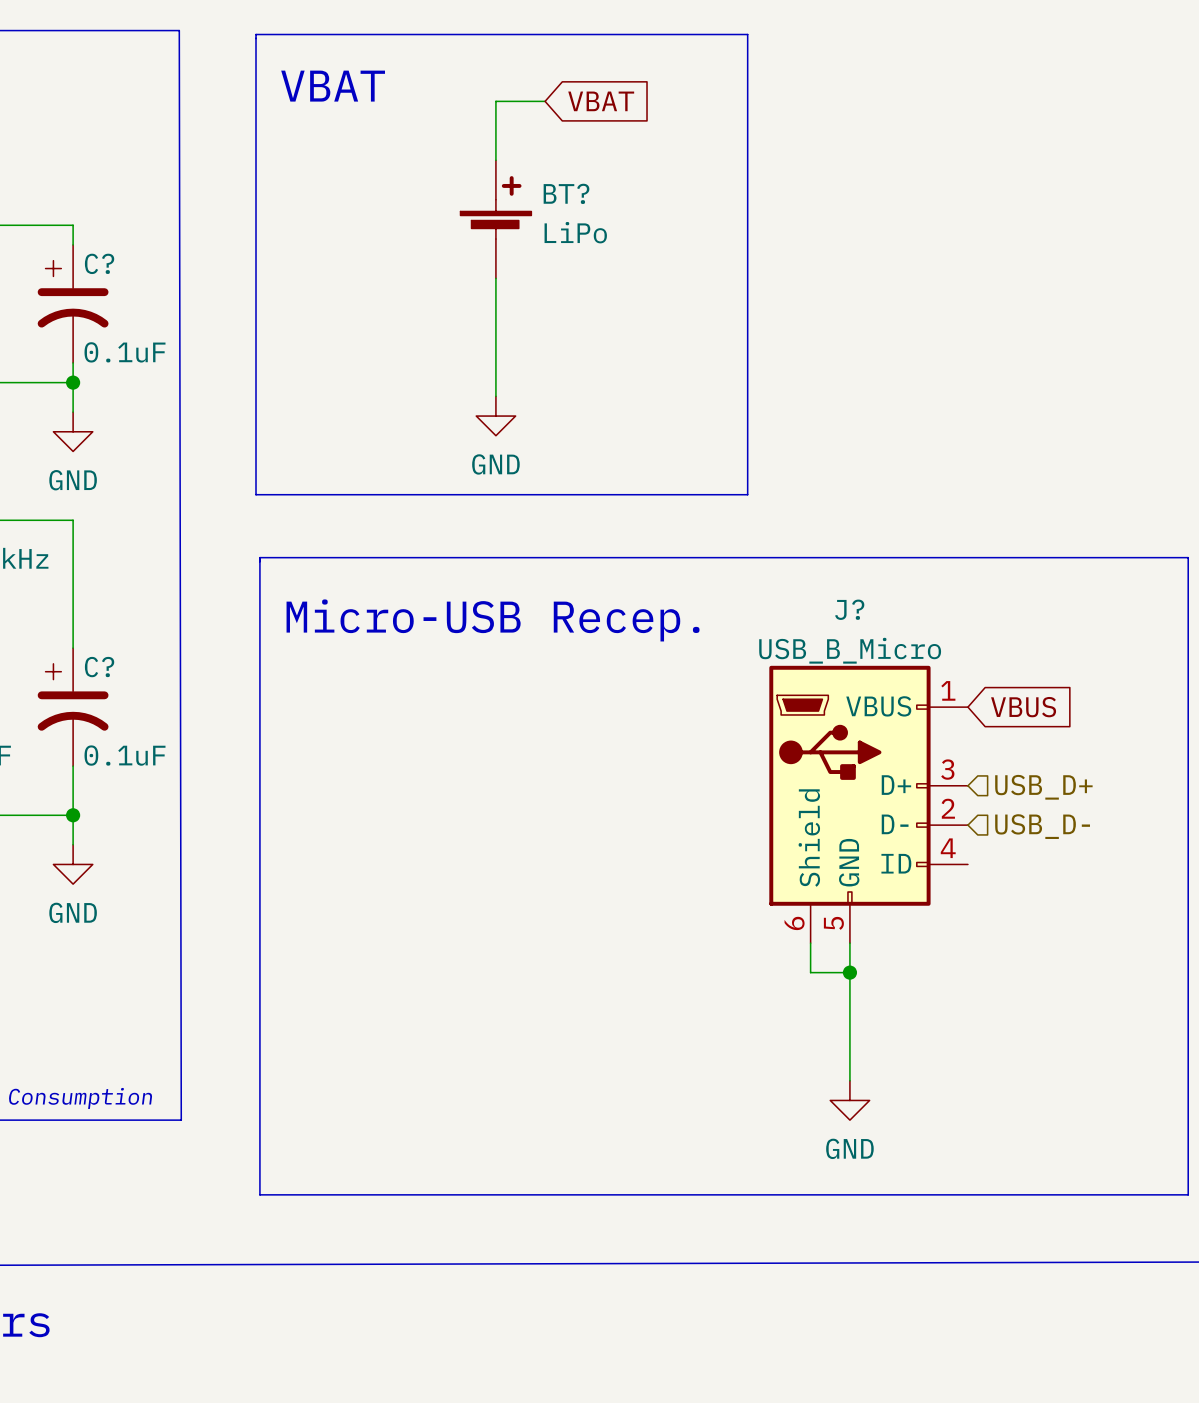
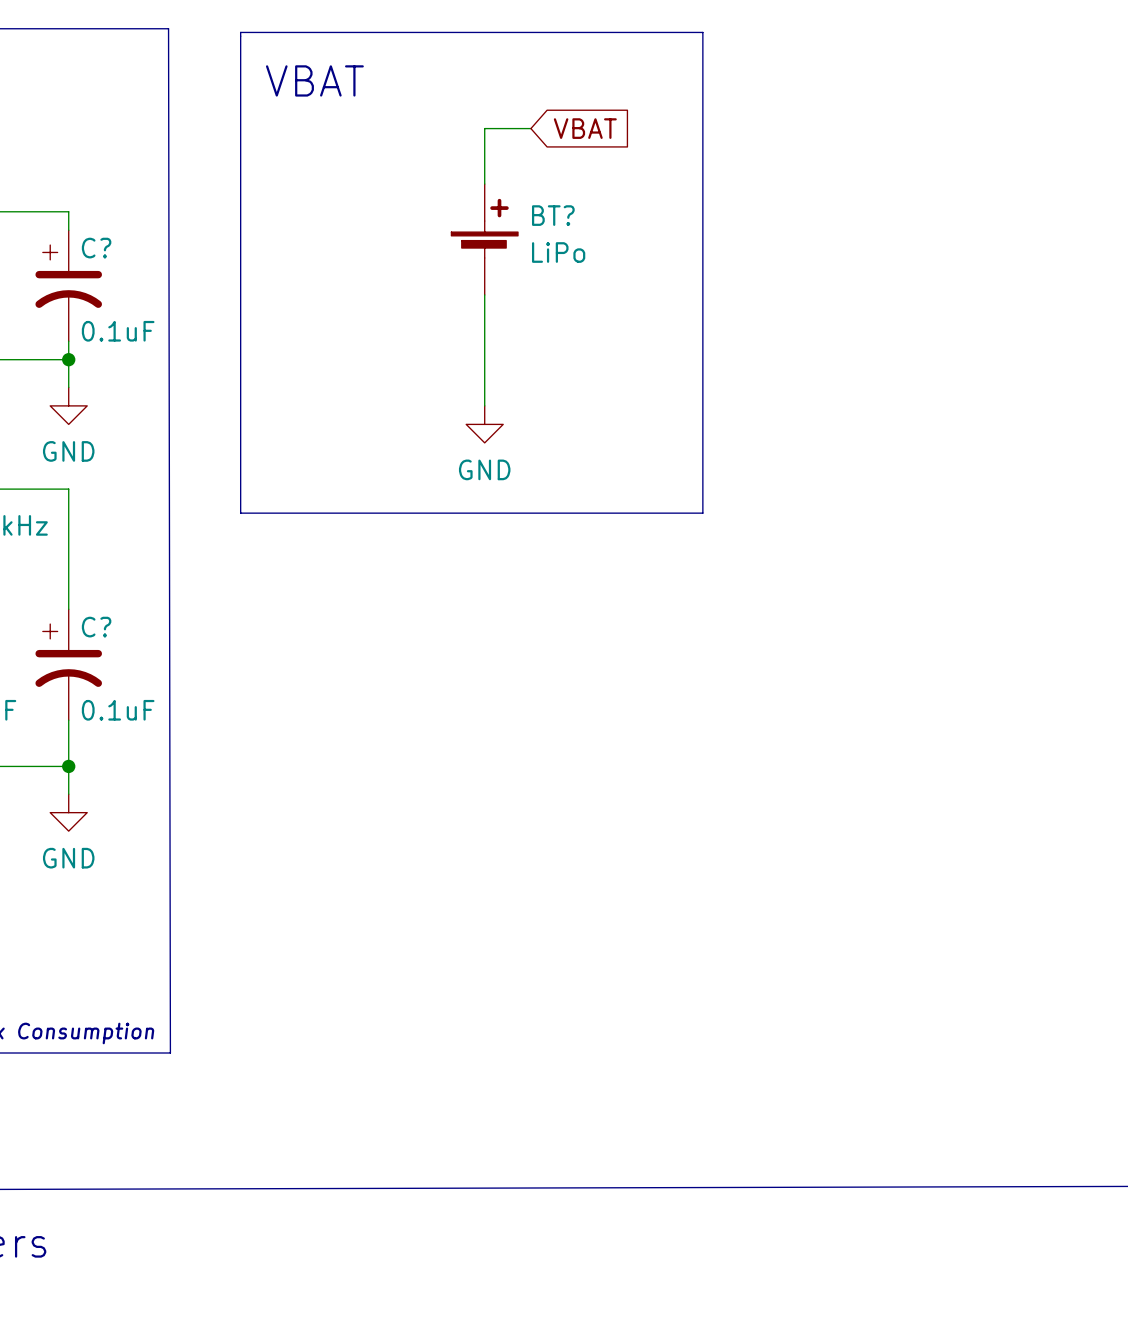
wire: (545, 101) (495, 101) (495, 160) -> (530, 128) (484, 128) (484, 184)
global label position: VBAT (601, 101) -> VBAT (585, 128)
BT? position: (495, 219) -> (484, 239)
wire: (495, 278) (495, 396) -> (484, 294) (484, 405)
power symbol position: GND (495, 416) -> GND (484, 424)
line: (256, 494) (747, 494) -> (240, 465) (240, 513) (702, 513) (702, 465)
line: (259, 557) (259, 1194) (1188, 1194) (1188, 557) (259, 557) -> none
text: Micro-USB Recep. (493, 620) -> none
global label: VBUS (1023, 707) -> none
hierarchical label: USB_D+ (1043, 787) -> none
J?: USB_B_Micro (868, 804) -> none
hierarchical label: USB_D- (1042, 826) -> none
wire: (810, 943) (810, 972) (849, 972) -> none
wire: (849, 943) (849, 1080) -> none
junction: (849, 972) -> none
power symbol: GND (849, 1100) -> none

